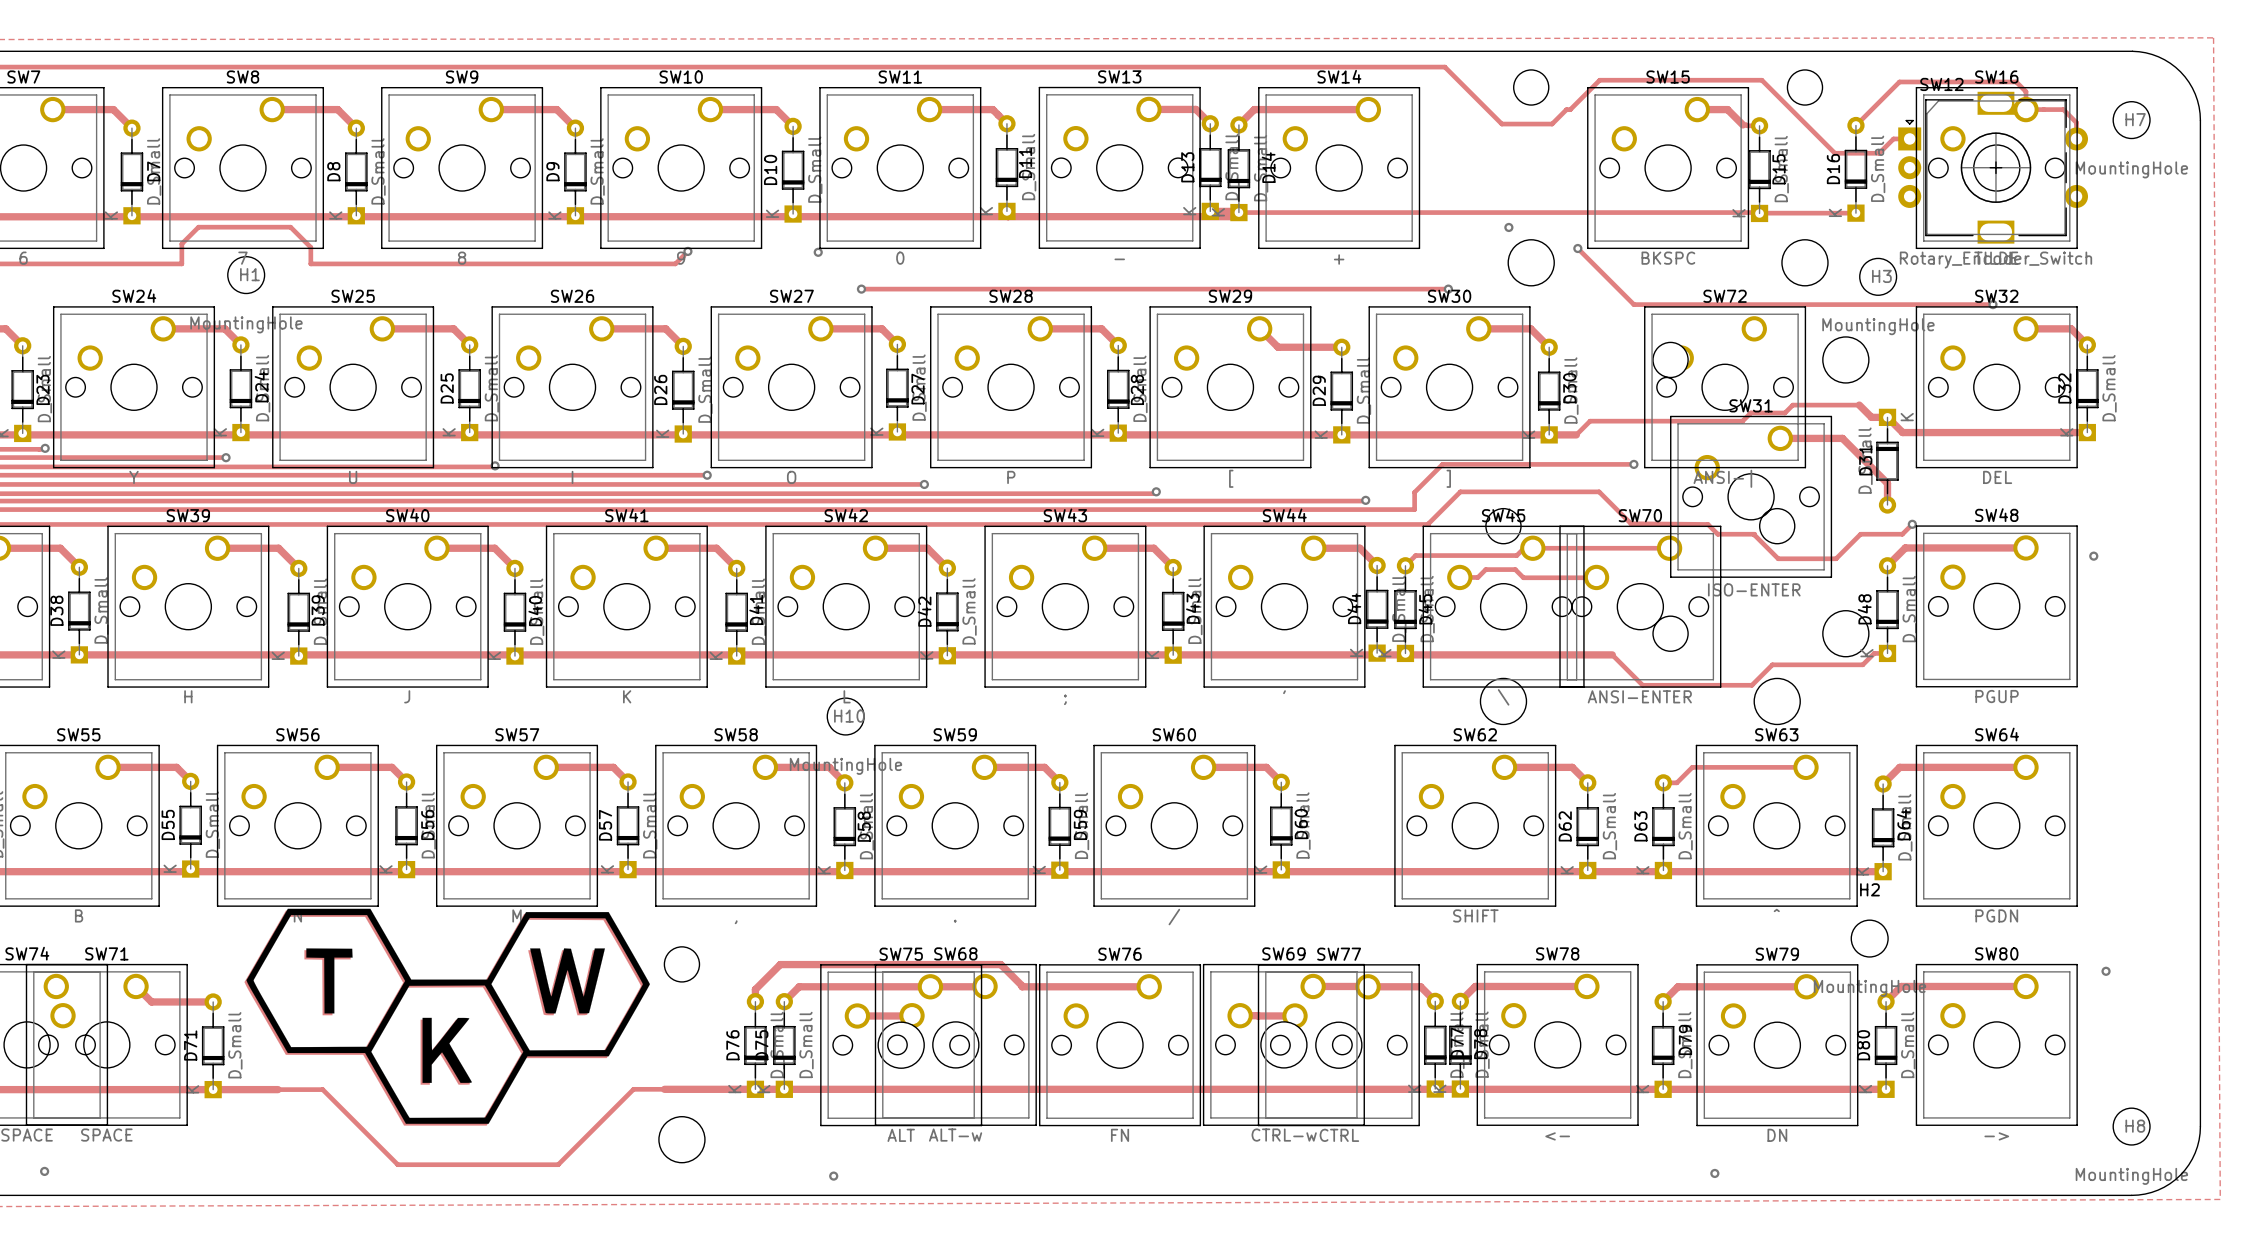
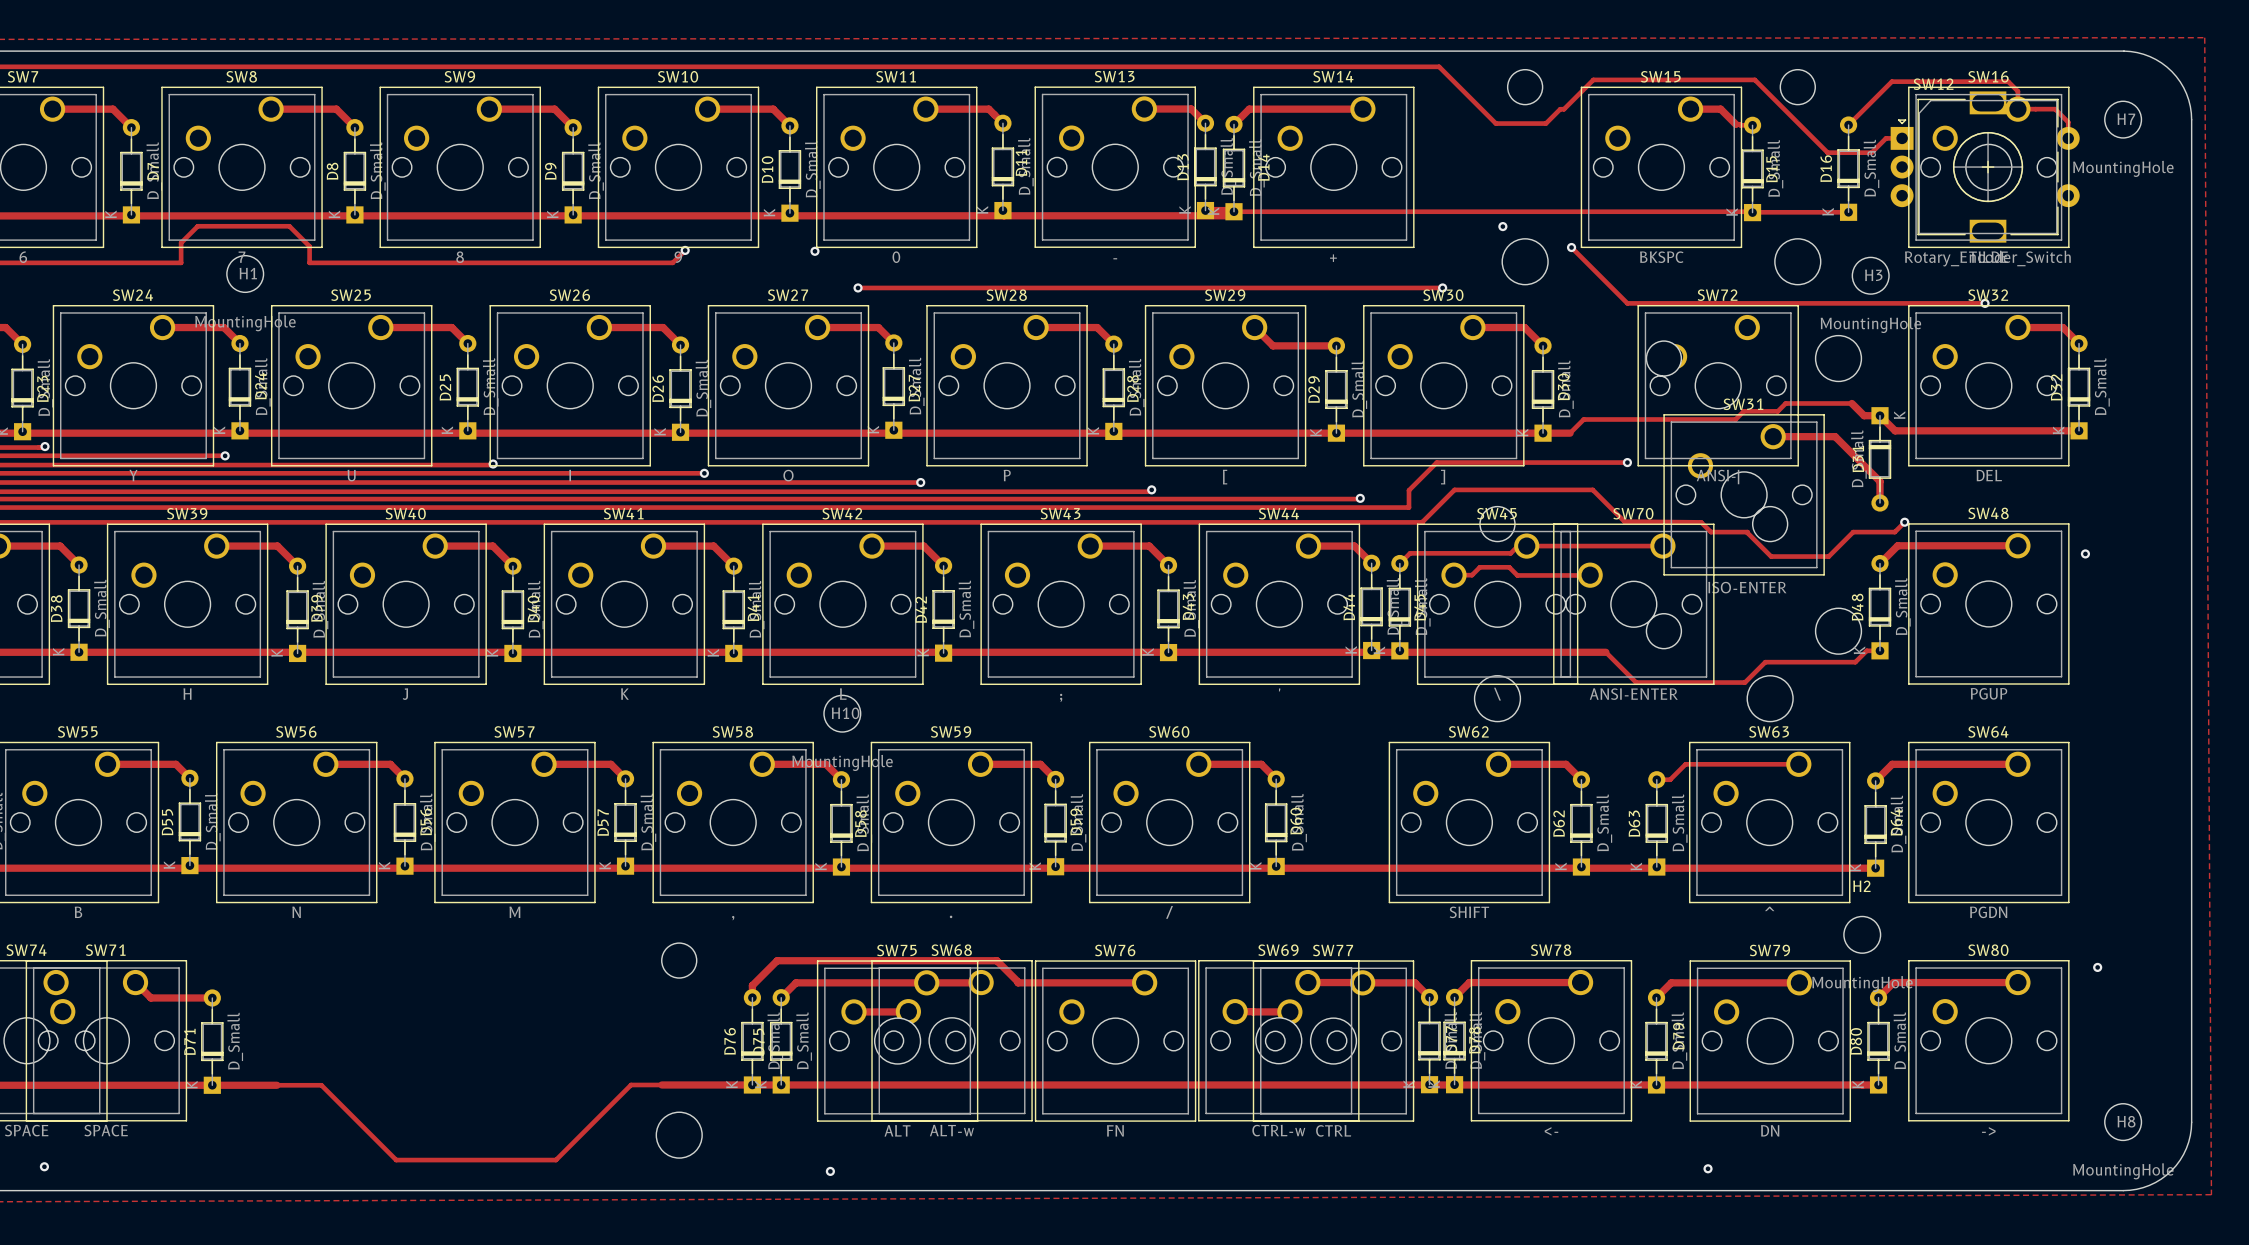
drawing: [244, 908, 650, 1126] -> none

